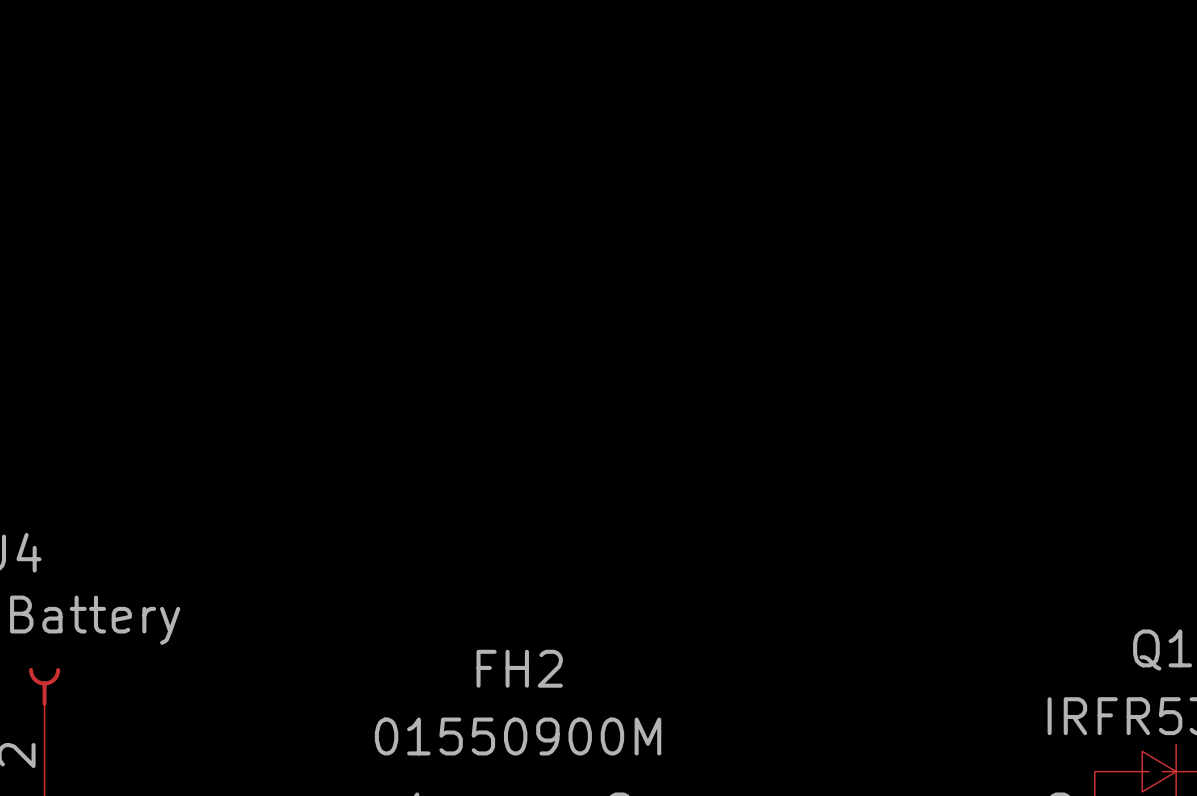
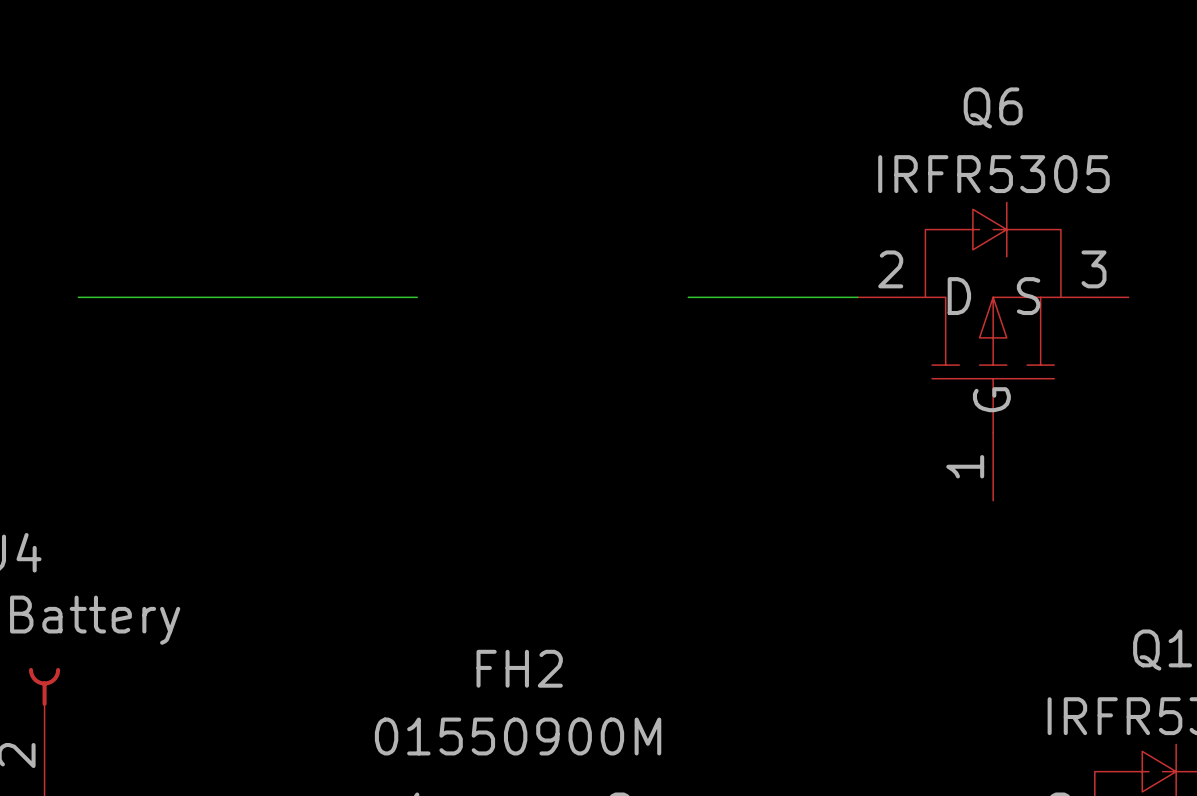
wire: none -> (78, 297) (417, 297)
wire: none -> (688, 297) (857, 297)
Q6: none -> IRFR5305 (993, 351)

